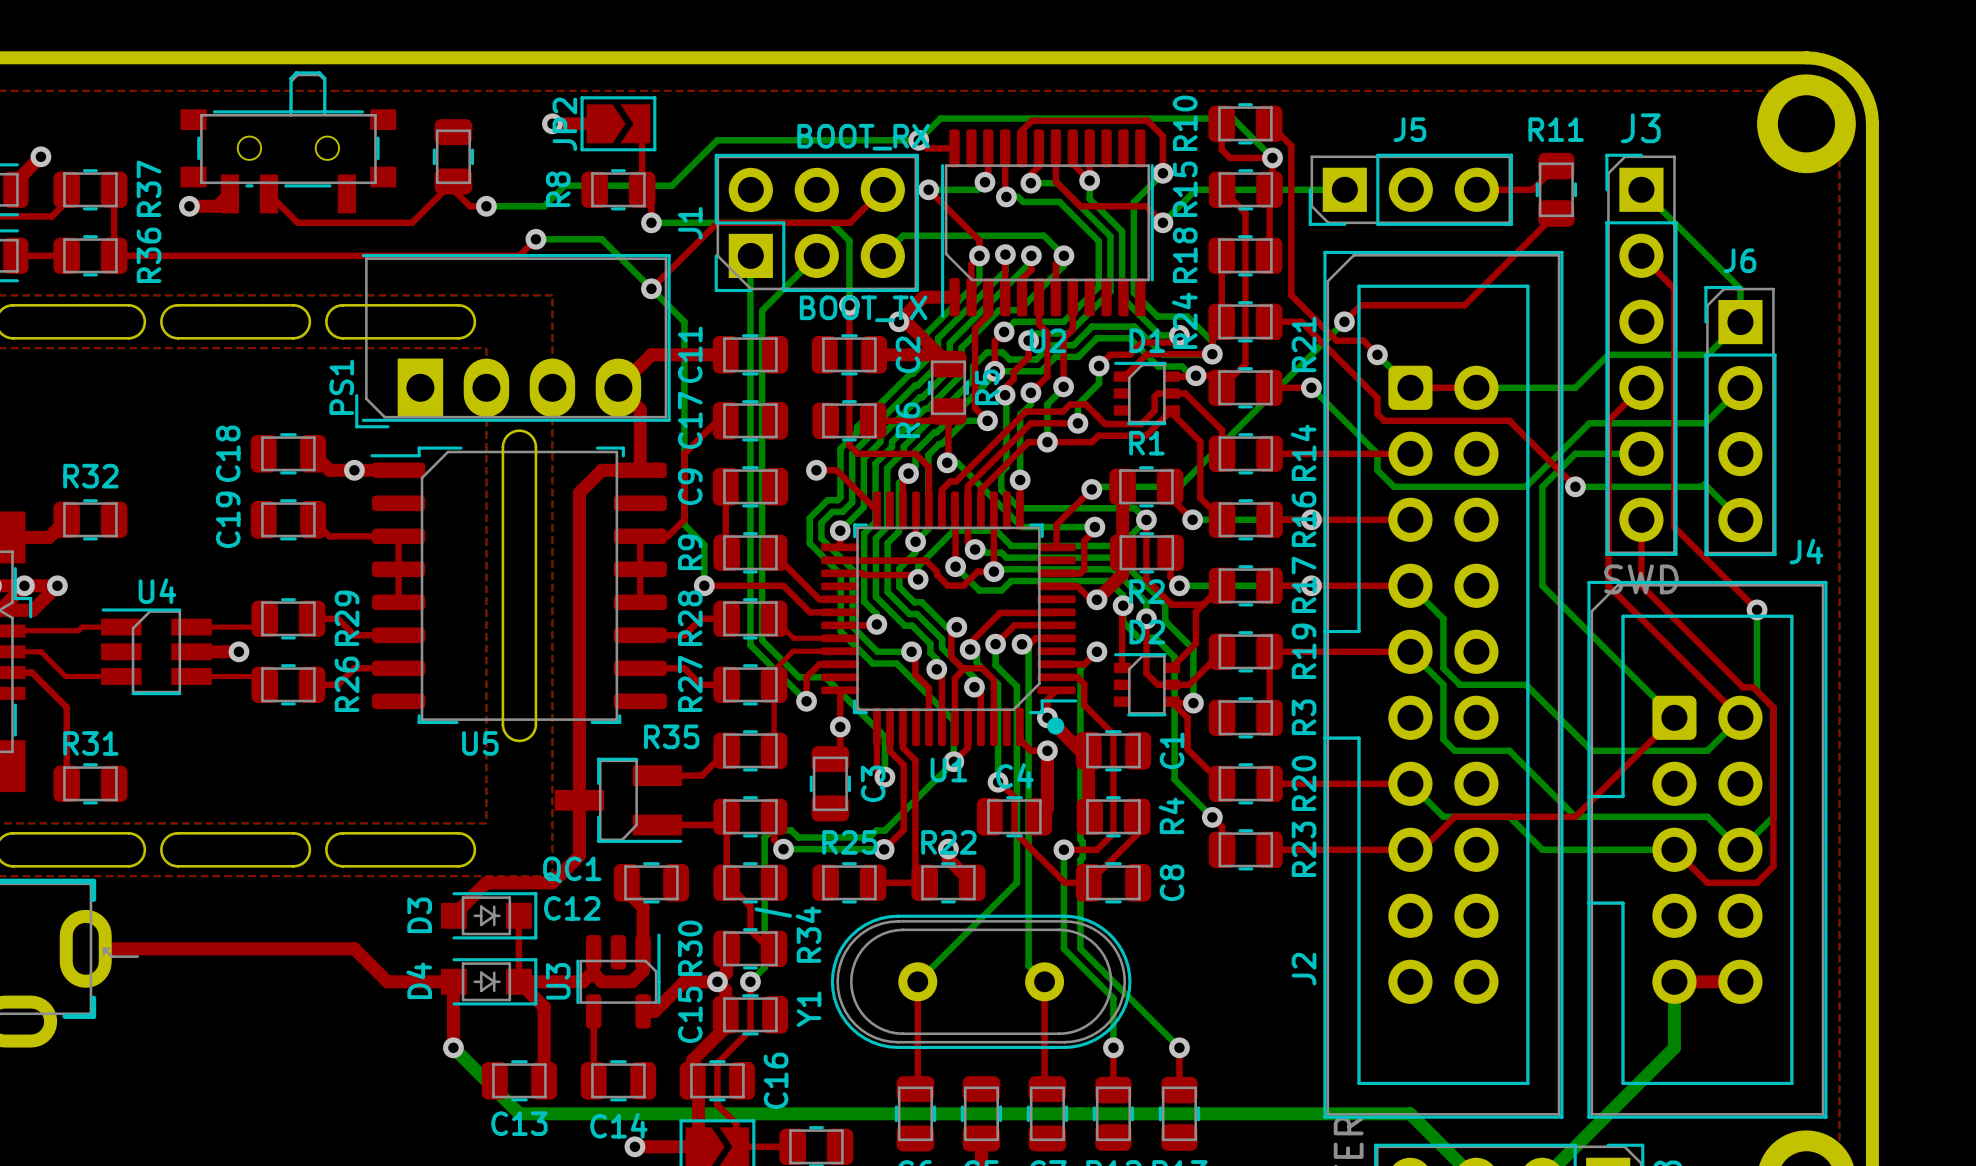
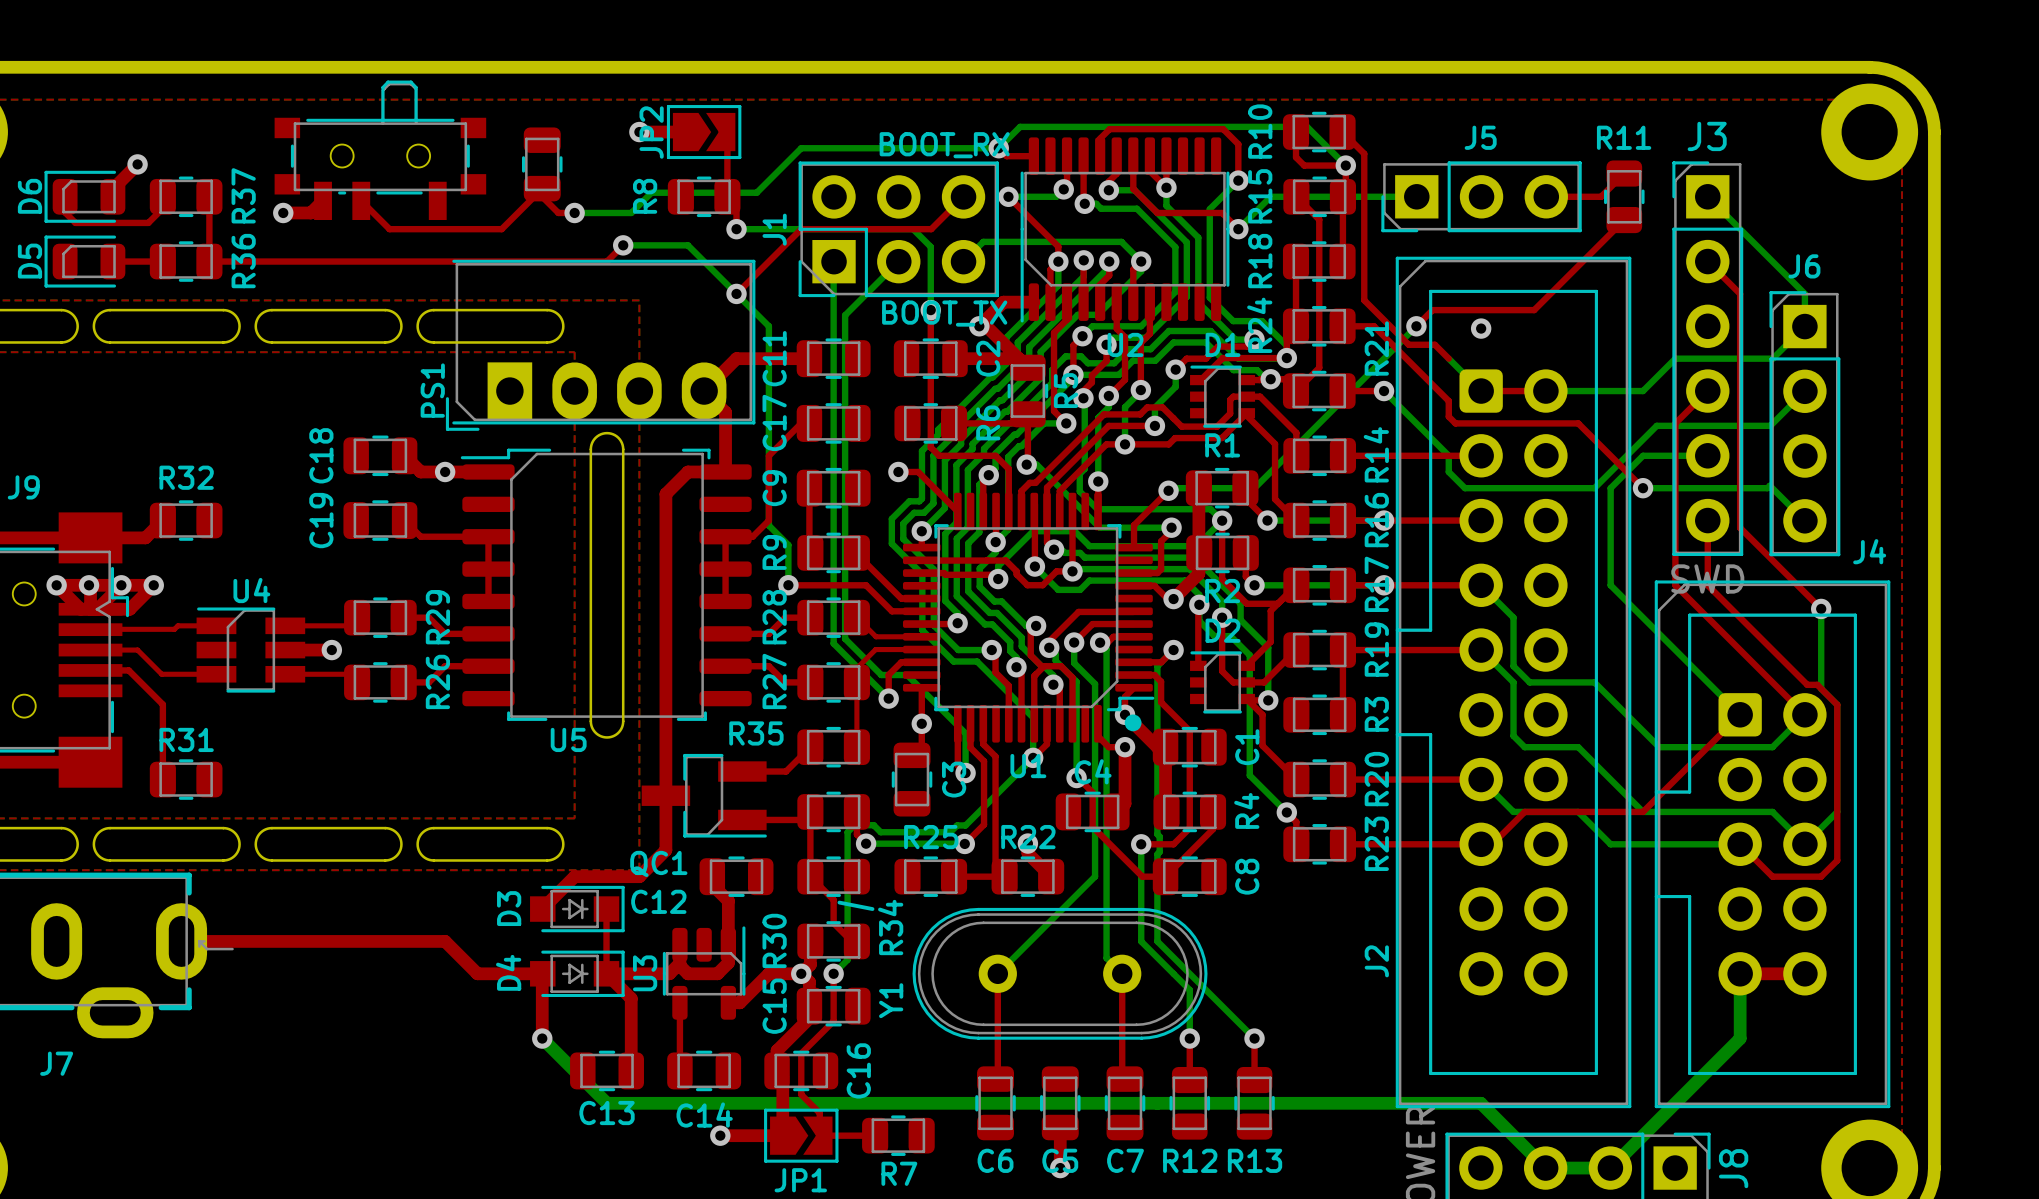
via position: (1377, 354) -> (1481, 328)

